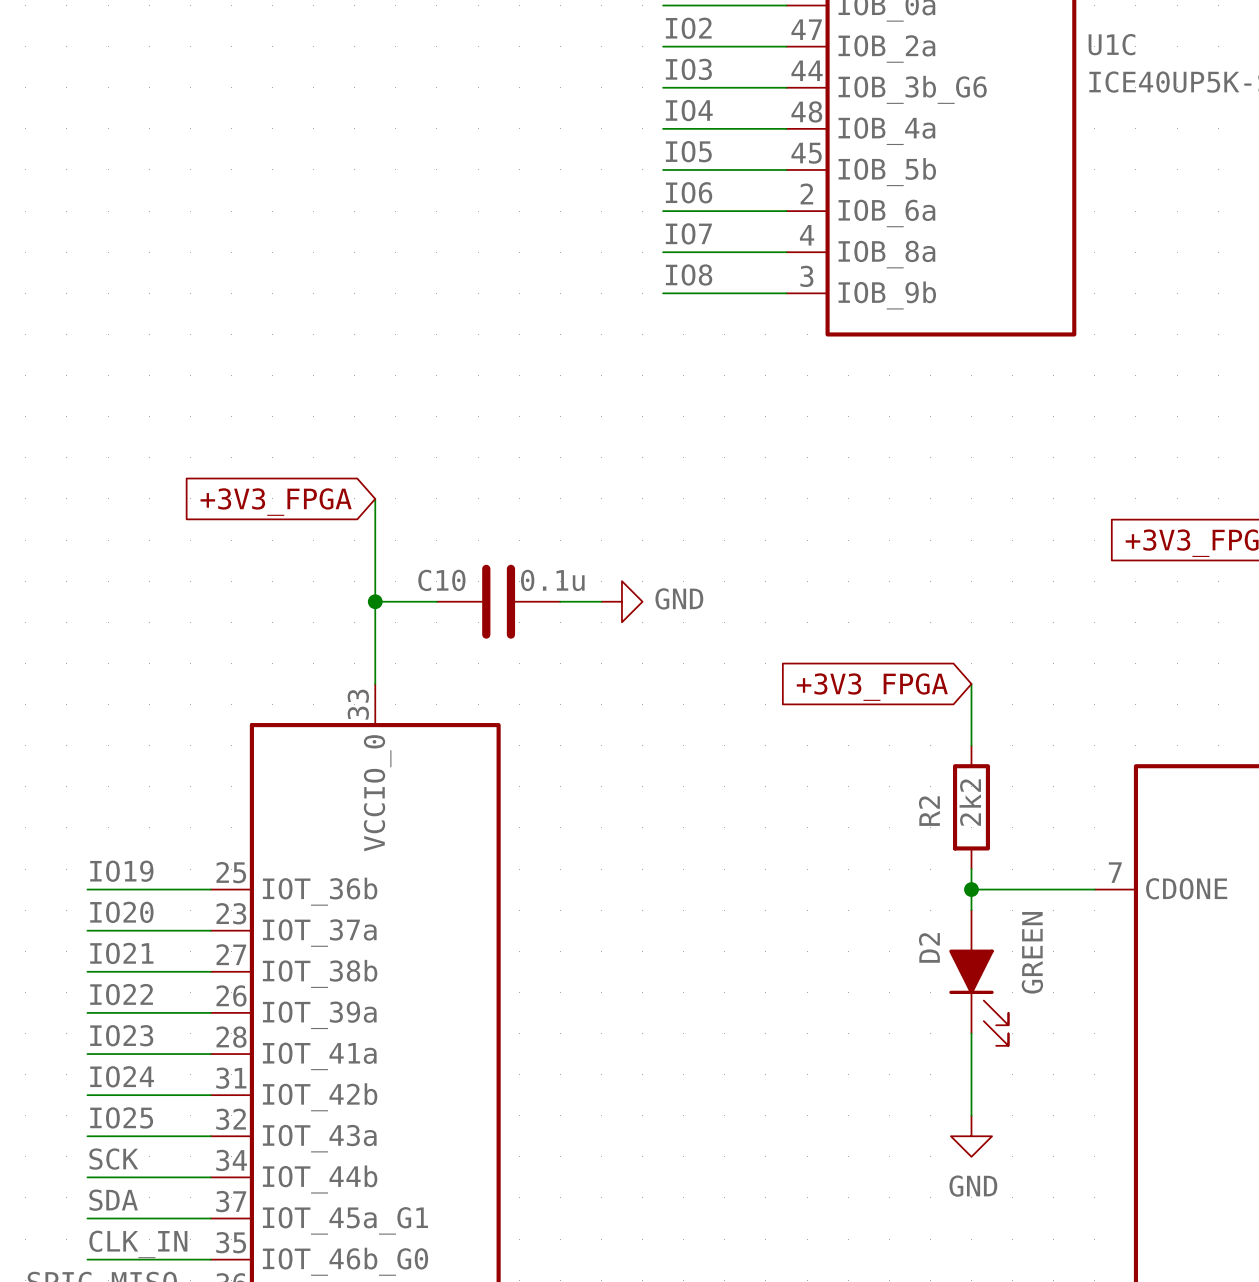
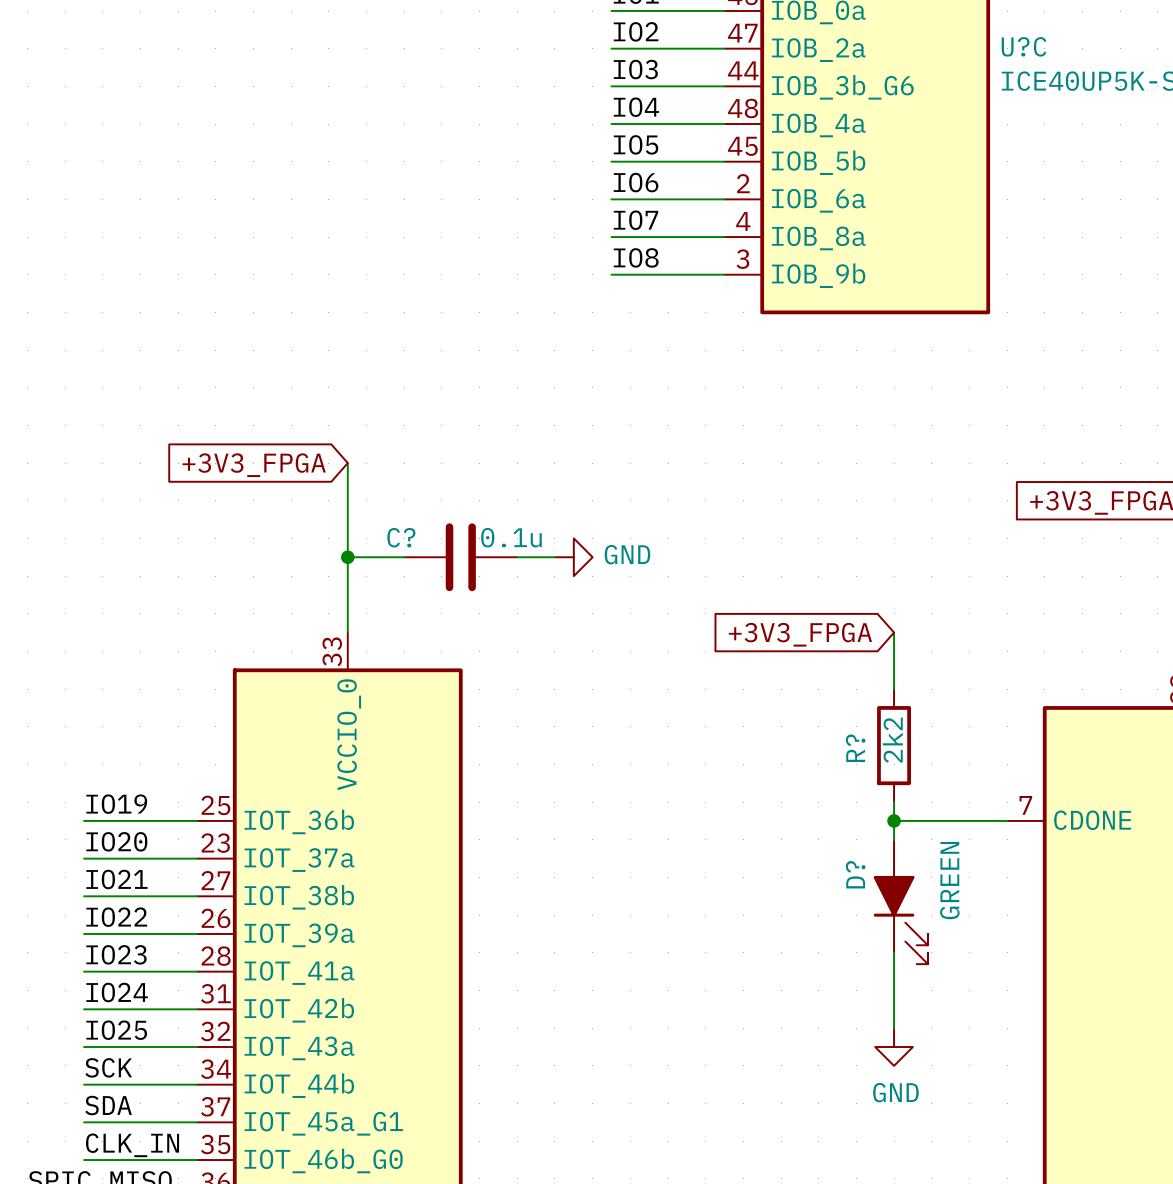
U1C name: U1C (1111, 44) -> U?C (1024, 46)
C10 name: C10 (441, 580) -> C? (401, 537)
R2 name: R2 (929, 811) -> R? (855, 748)
D2 name: D2 (929, 947) -> D? (855, 874)

